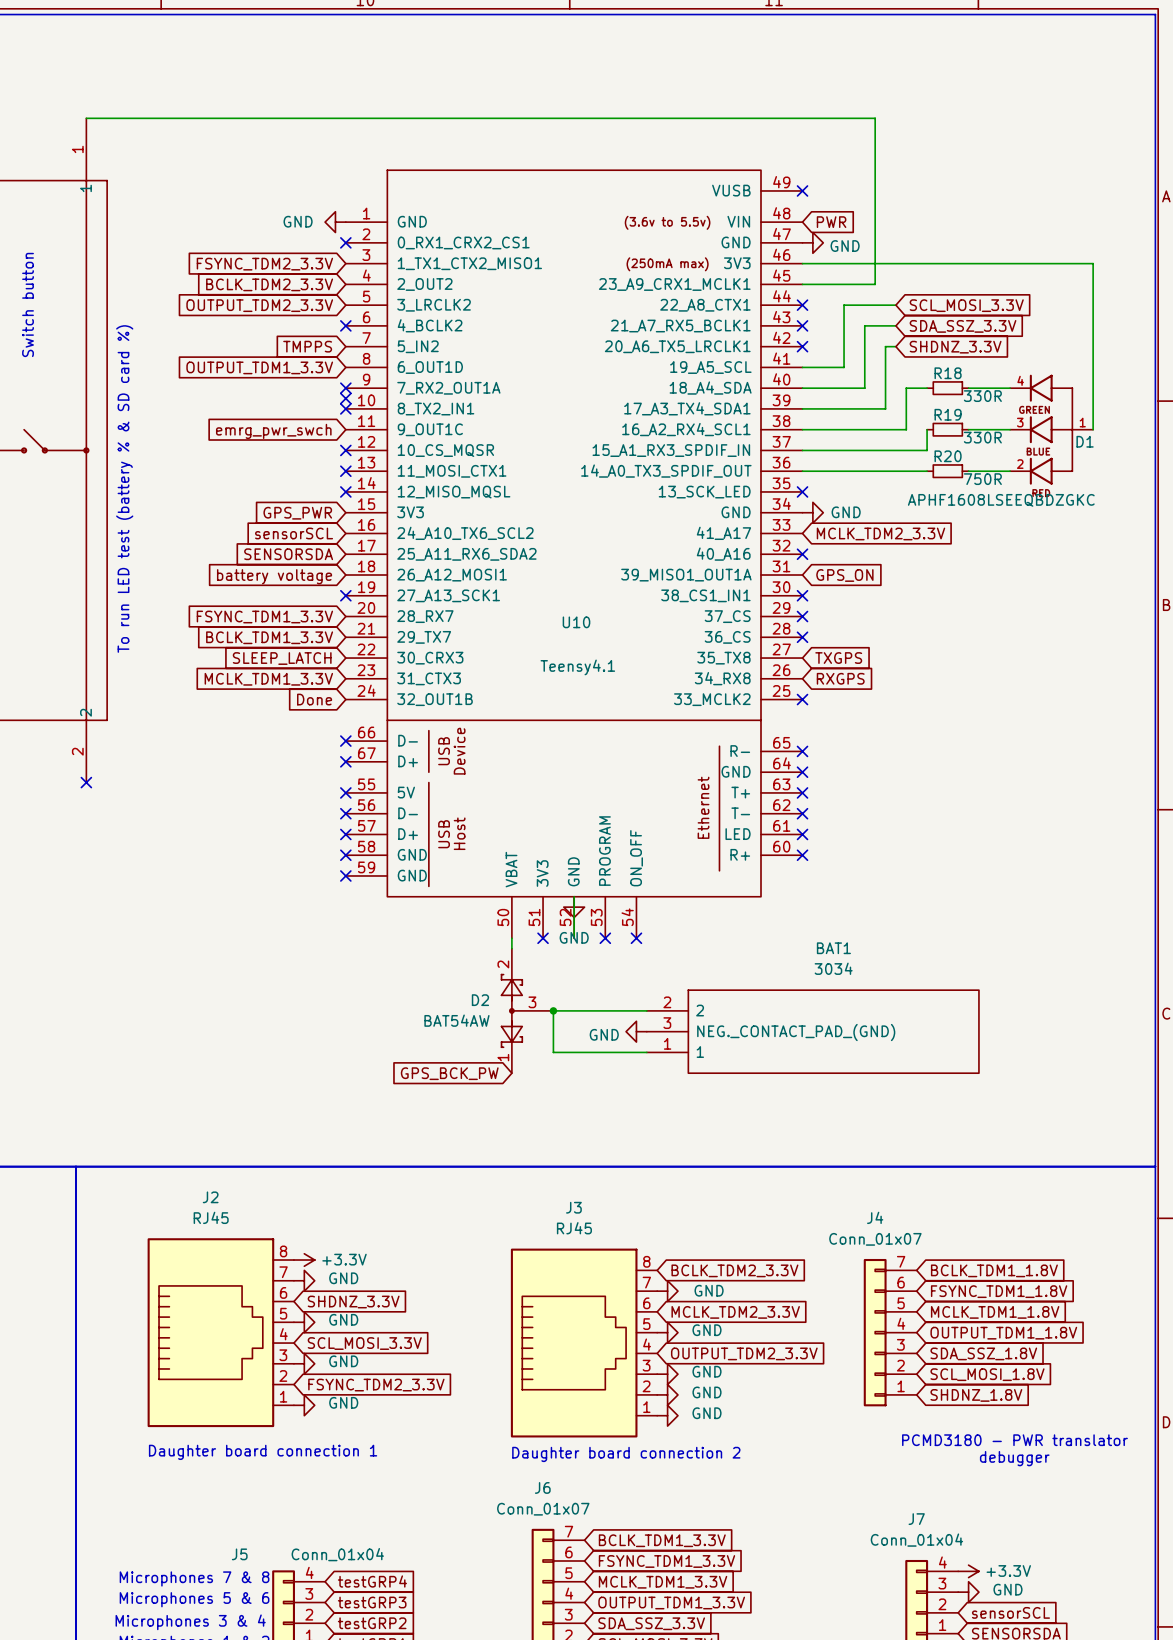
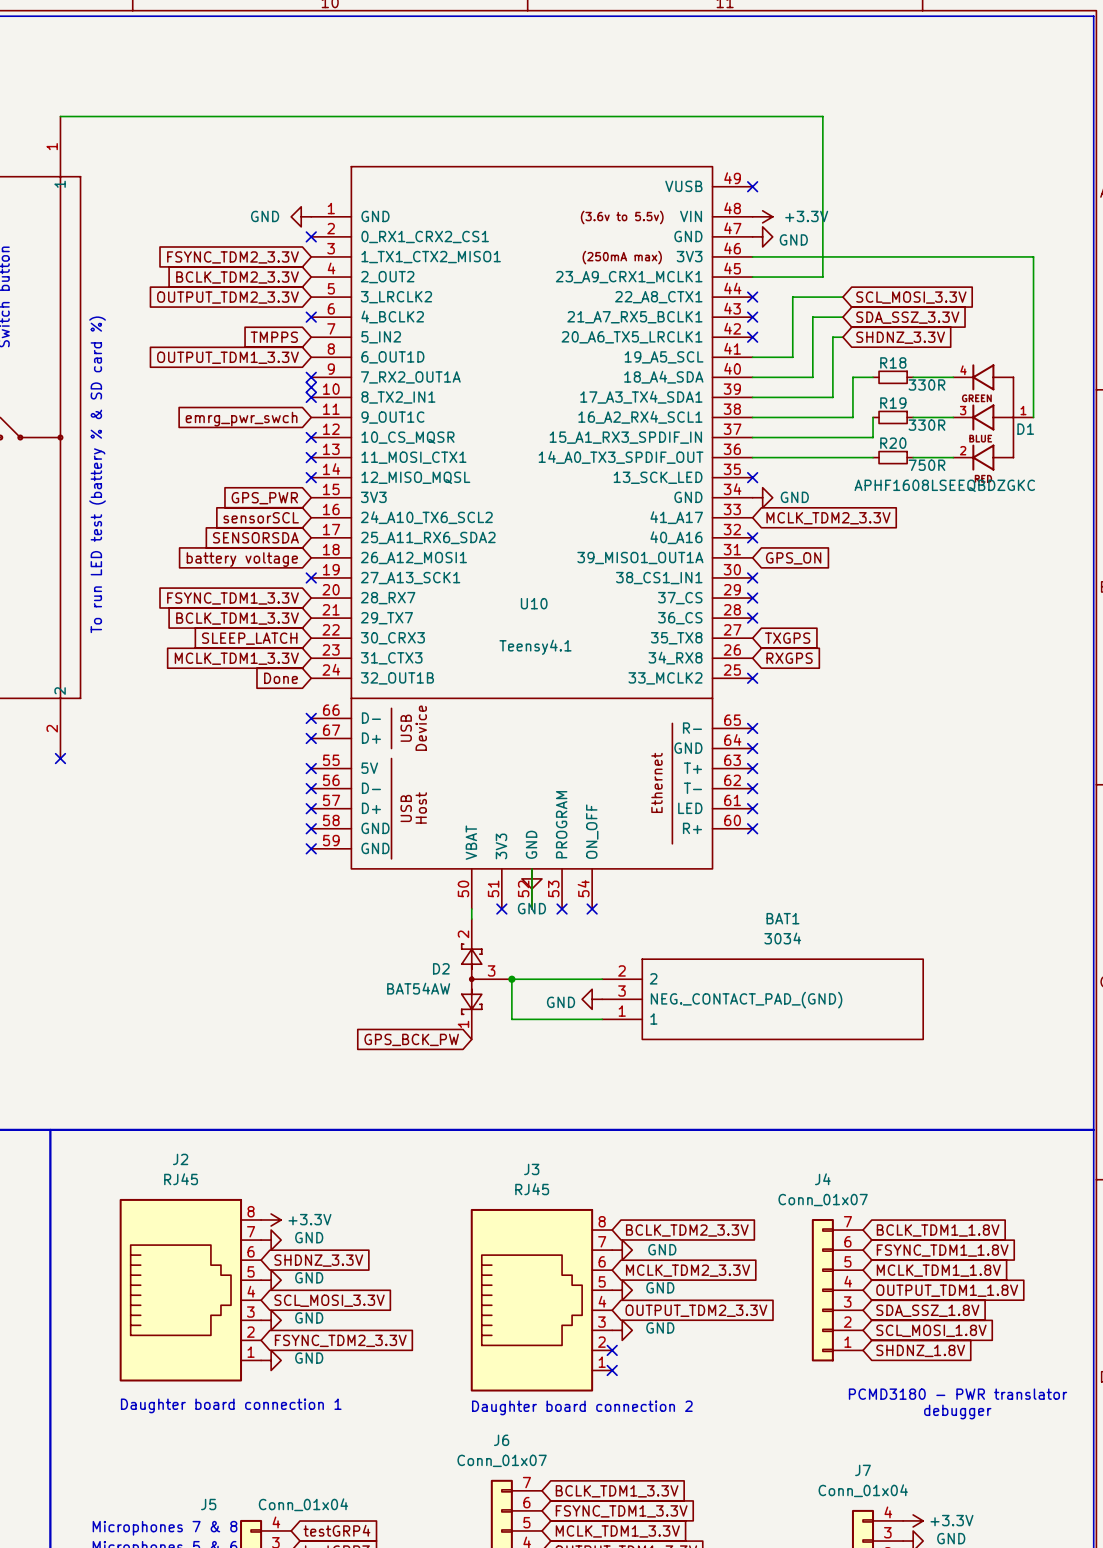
power symbol: none -> +3.3V (762, 216)
global label: PWR (831, 222) -> none
no-connect mark: none -> (612, 1350)
power symbol: GND (667, 1394) -> none
no-connect mark: none -> (612, 1370)
power symbol: GND (667, 1415) -> none

